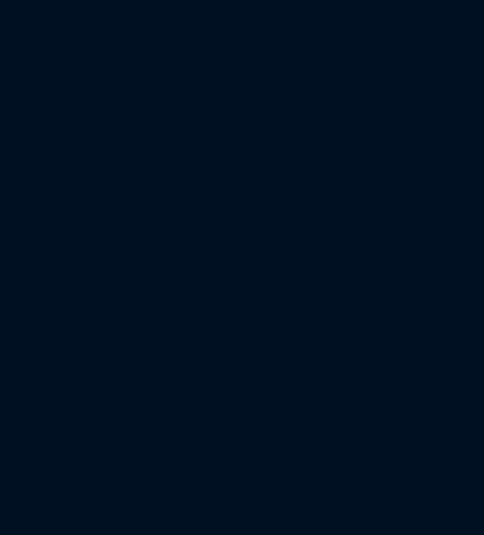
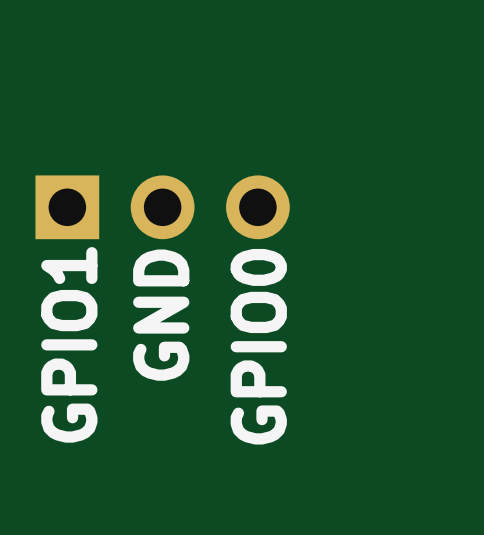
part: none -> (162, 207)
text: none -> GND (161, 315)
text: none -> GPIO1 (69, 344)
text: none -> GPIO0 (258, 346)

